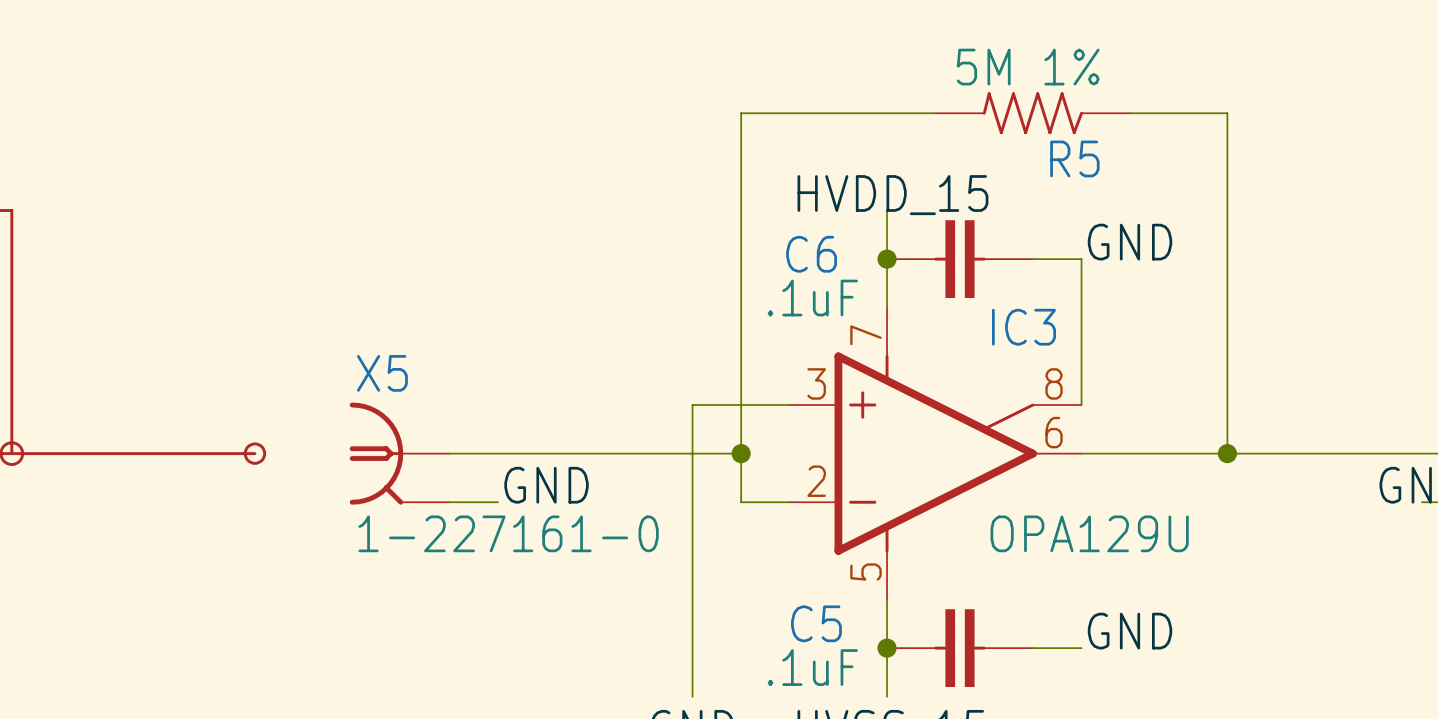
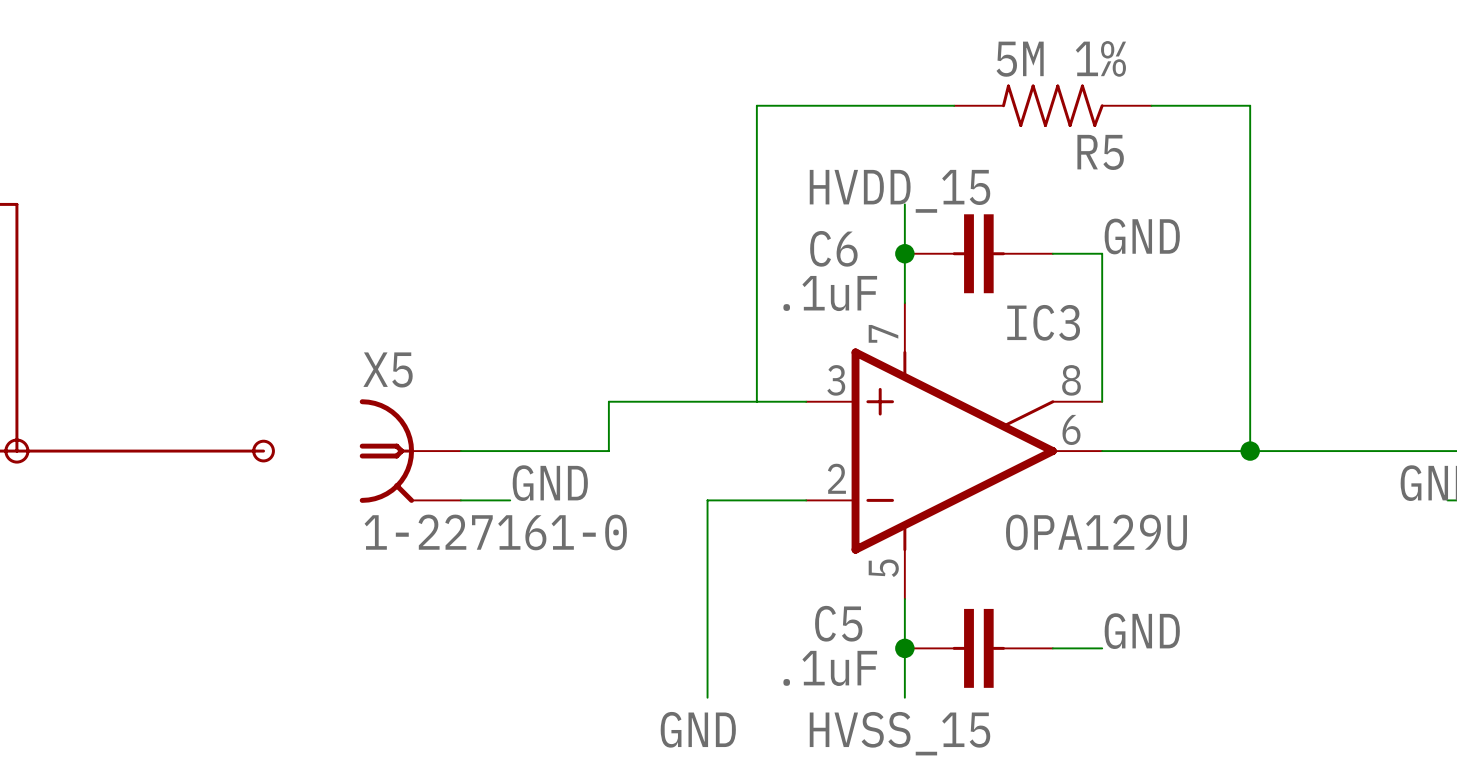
wire: (692, 405) (692, 502) -> (756, 500) (707, 500)
wire: (741, 405) (741, 502) -> none
wire: (595, 453) (741, 453) -> (608, 451) (608, 401) (707, 401)
junction: (741, 453) -> none

